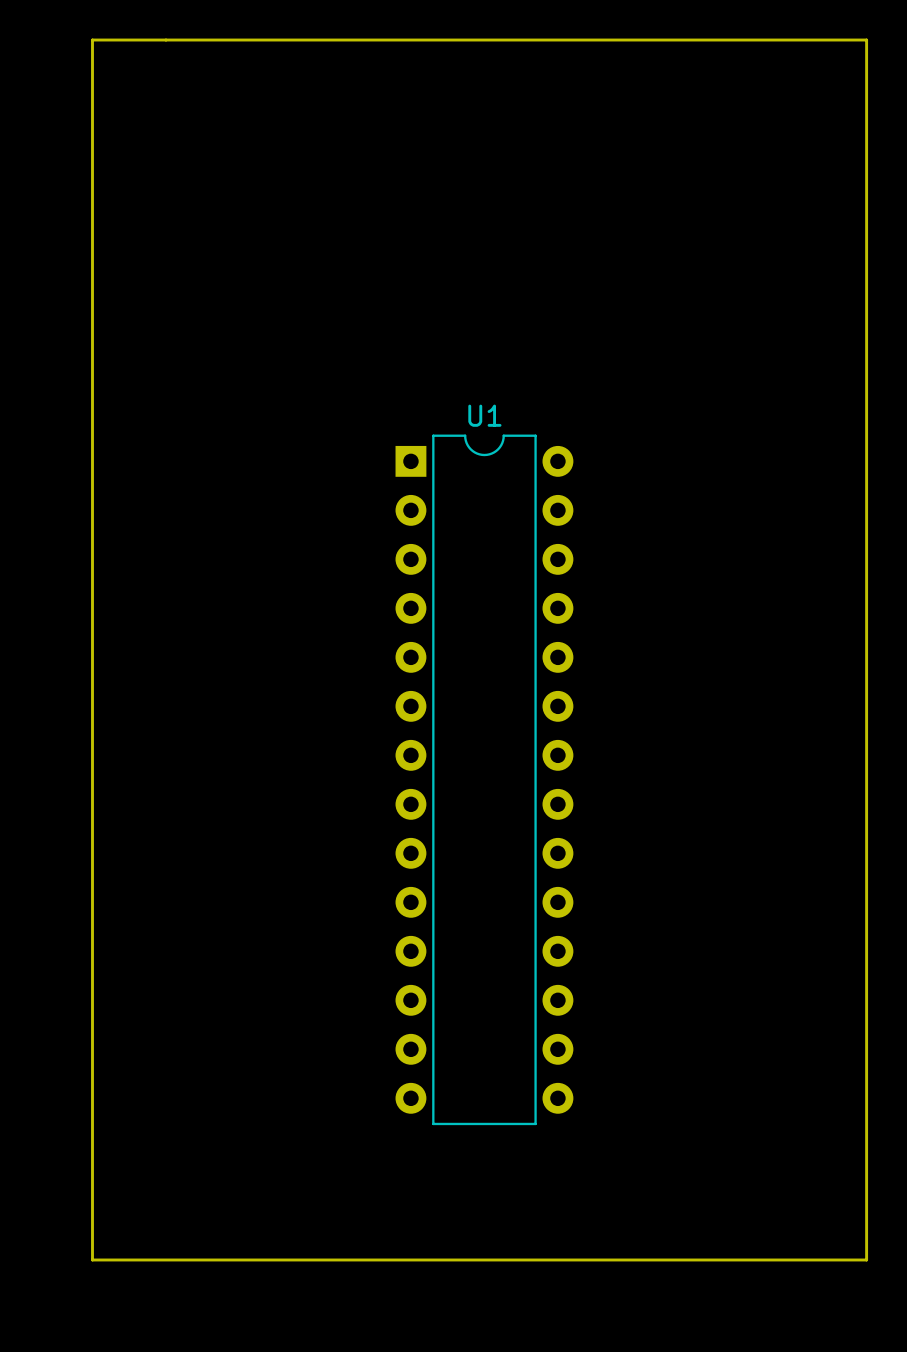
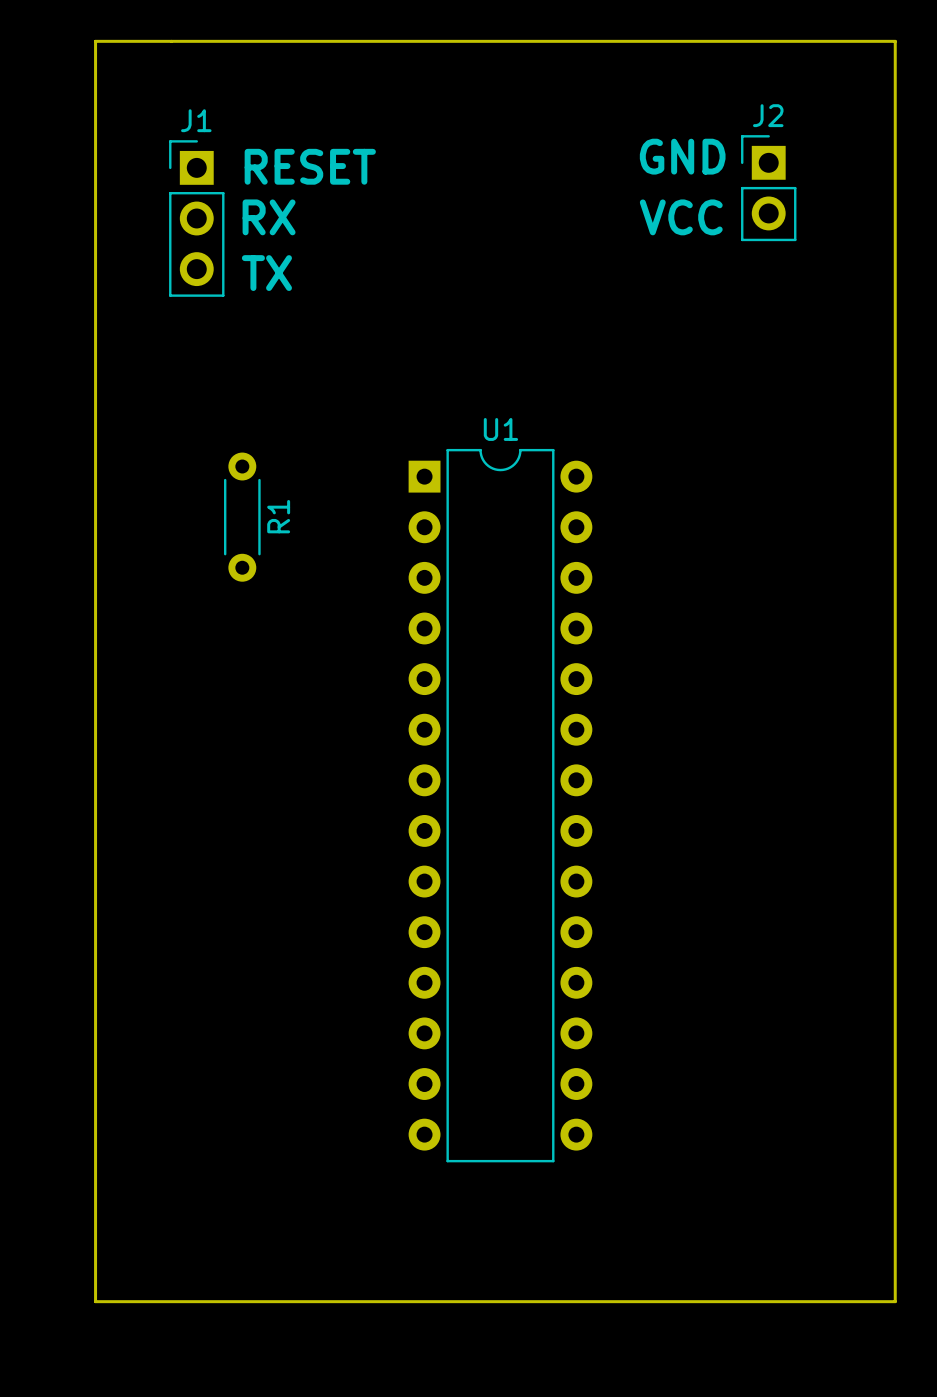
text: none -> GND (682, 156)
text: none -> RESET (310, 166)
J2: none -> (768, 188)
text: none -> RX (269, 217)
text: none -> VCC (681, 217)
J1: none -> (196, 218)
text: none -> TX (266, 273)
R1: none -> (242, 517)

